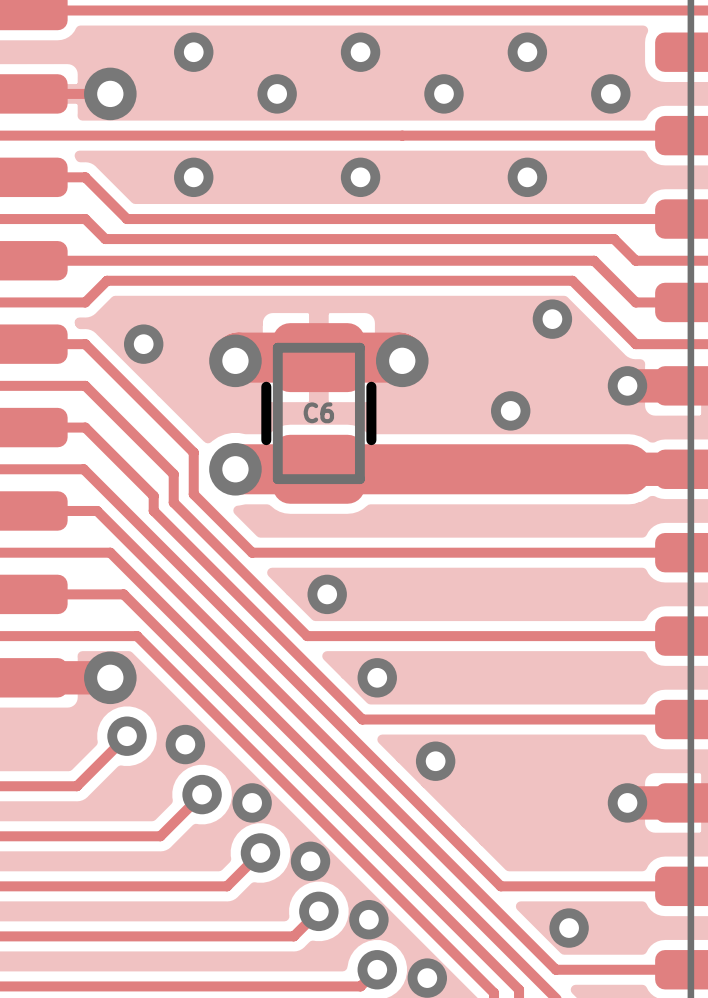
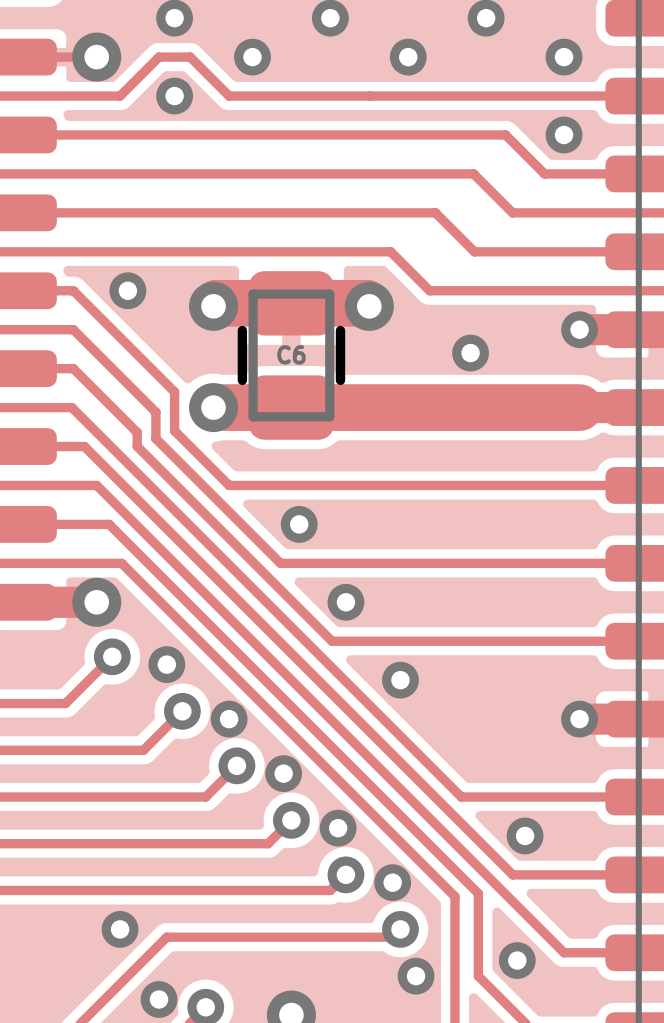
track: (135, 135) (252, 135) -> (120, 96) (159, 57) (190, 57) (229, 96)
track: (85, 177) (127, 219) -> (73, 173) (112, 173)
track: none -> (73, 134) (505, 134) (544, 173)
via position: (193, 177) -> (174, 96)
via: (360, 177) -> none
via: (527, 177) -> none
via: none -> (564, 134)
track: (85, 219) (105, 239) (614, 239) (635, 260) -> none
track: (514, 219) (589, 219) -> (473, 173) (512, 212)
track: (473, 260) (555, 260) -> (435, 212) (474, 251) (587, 251)
track: (594, 260) (635, 302) -> (548, 212) (587, 212)
track: (85, 302) (106, 280) (572, 280) (635, 344) -> (73, 251) (390, 251) (429, 290) (587, 290)
via: (552, 319) -> none

